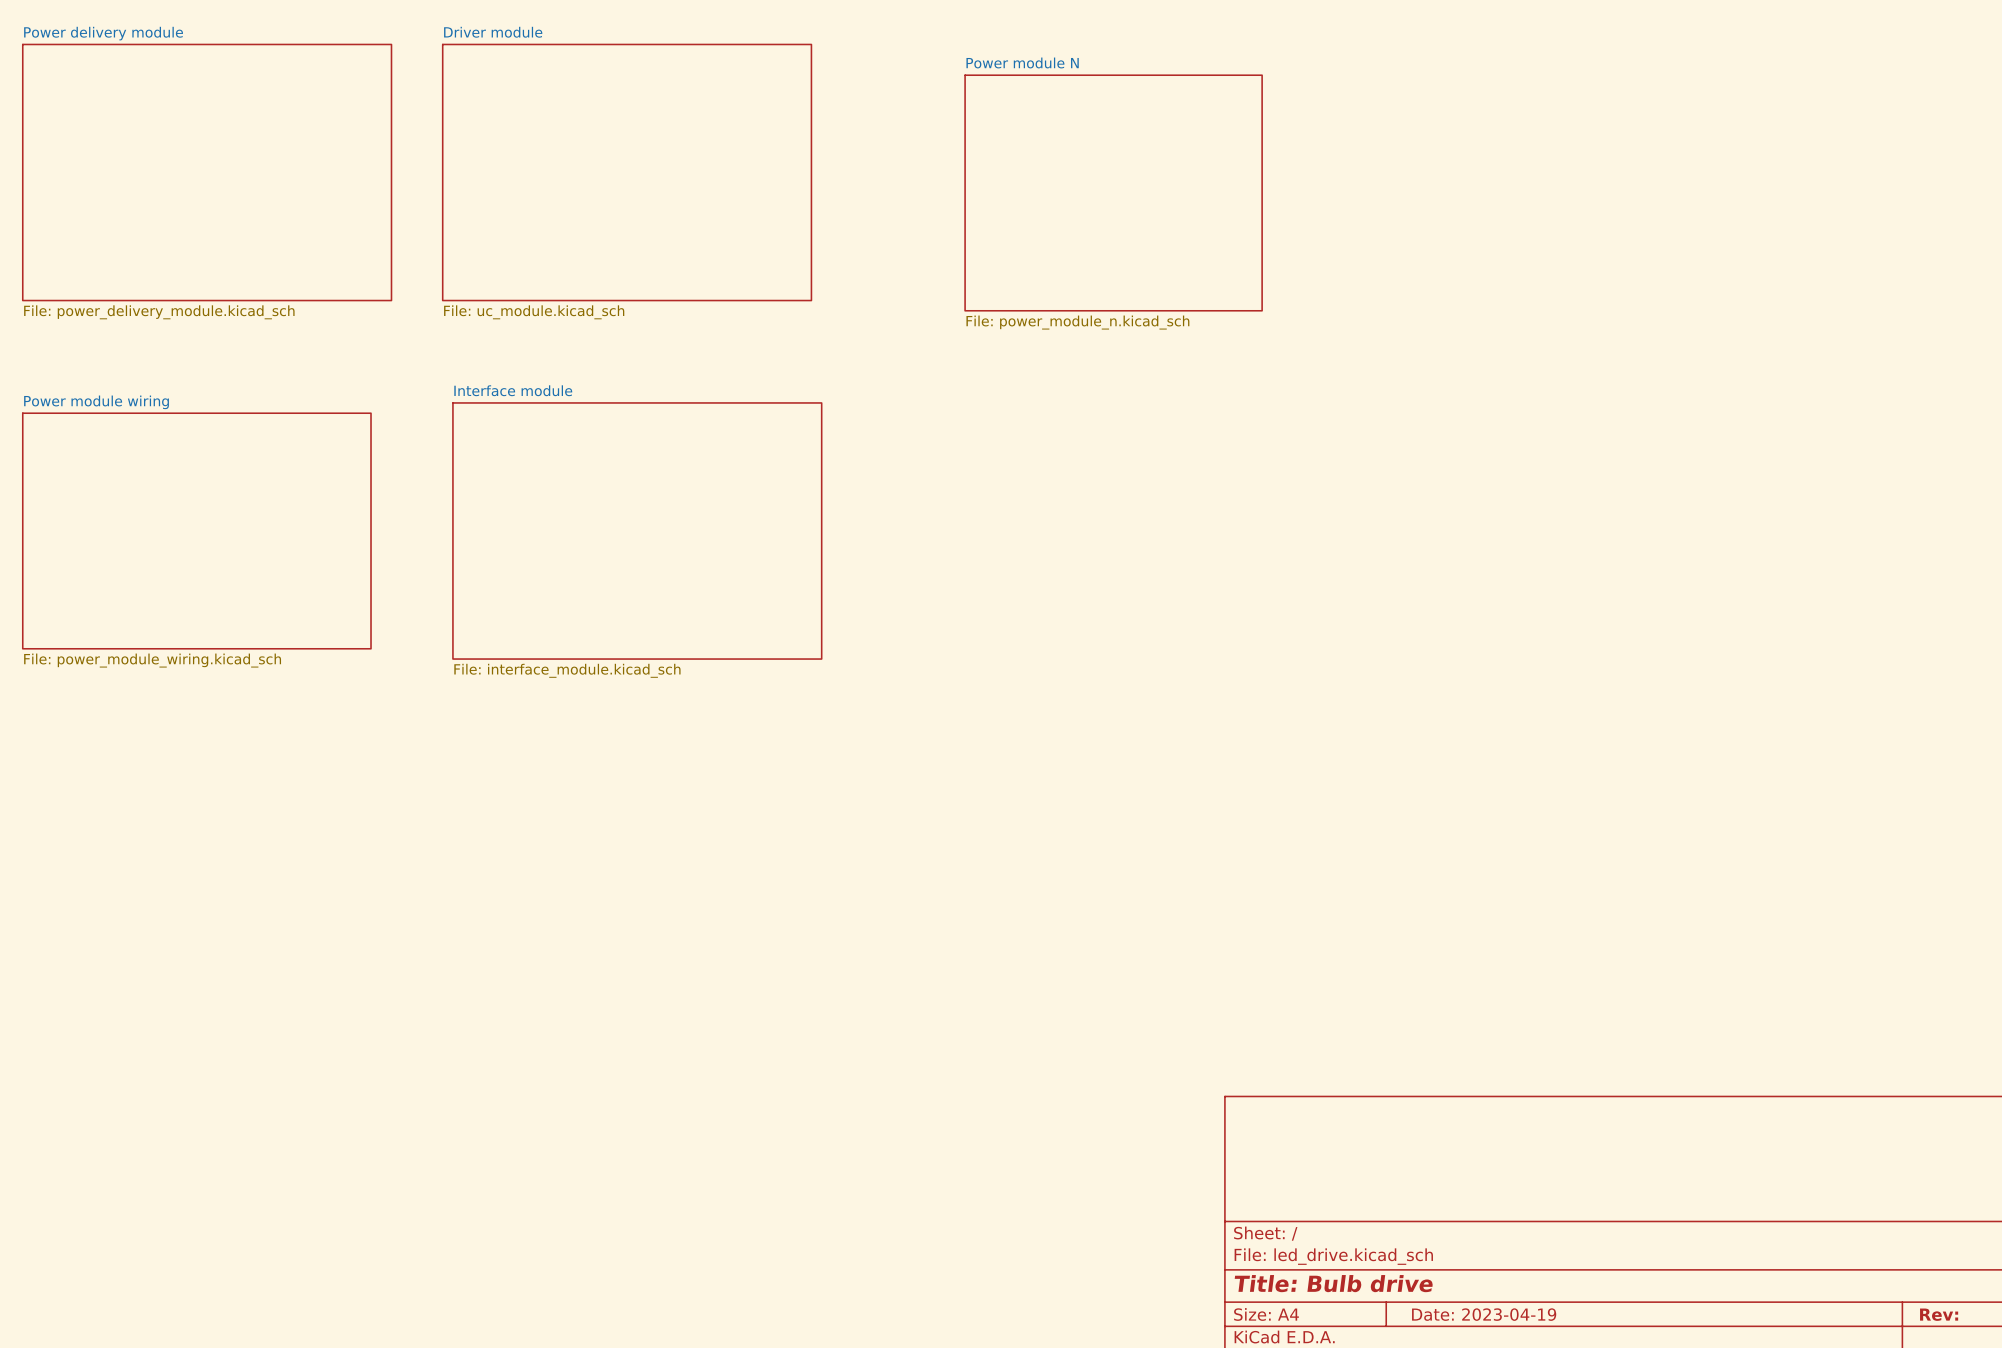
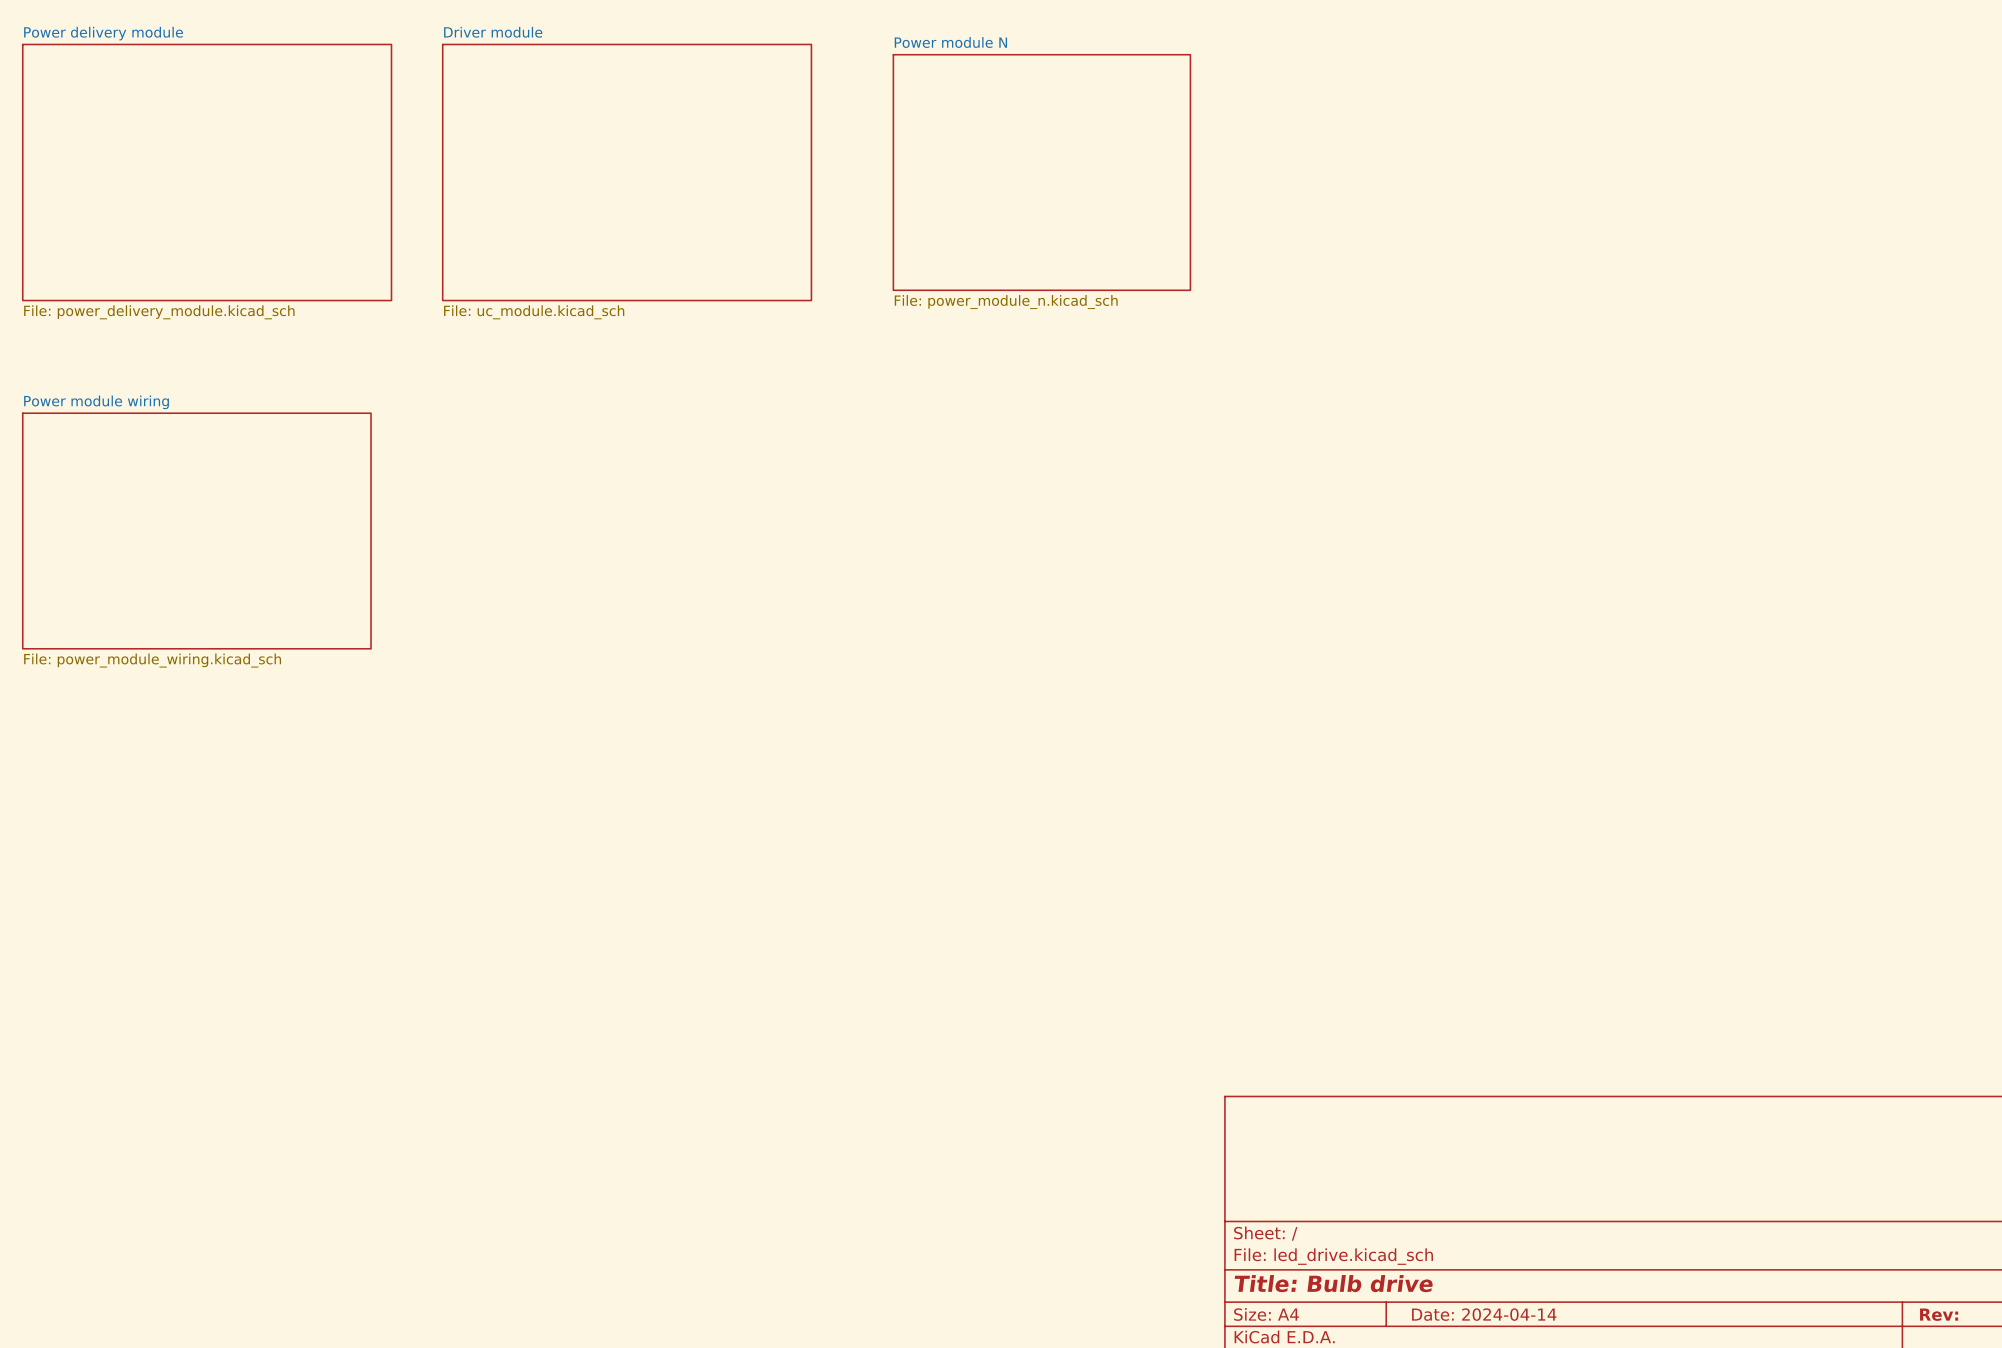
sheet Power module N position: (1113, 192) -> (1041, 172)
sheet Interface module: File: interface_module.kicad_sch (637, 531) -> none
title block: Date: 2023-04-19 (1484, 1314) -> Date: 2024-04-14 (1484, 1314)

